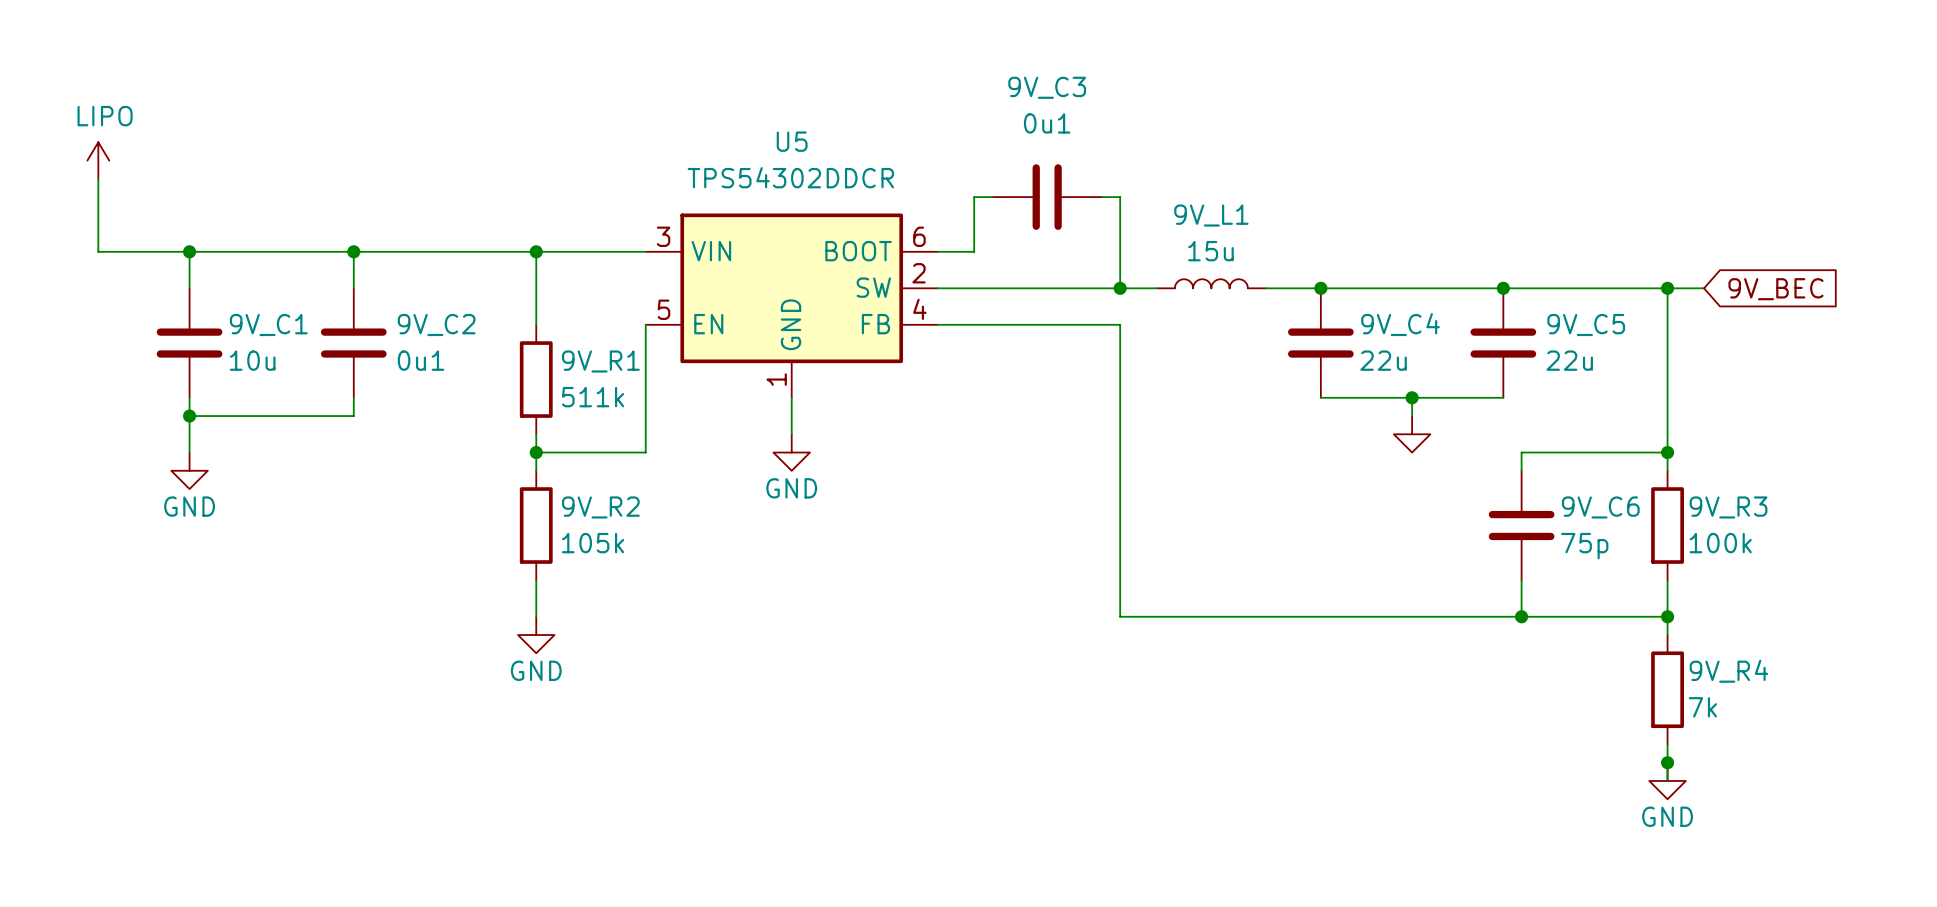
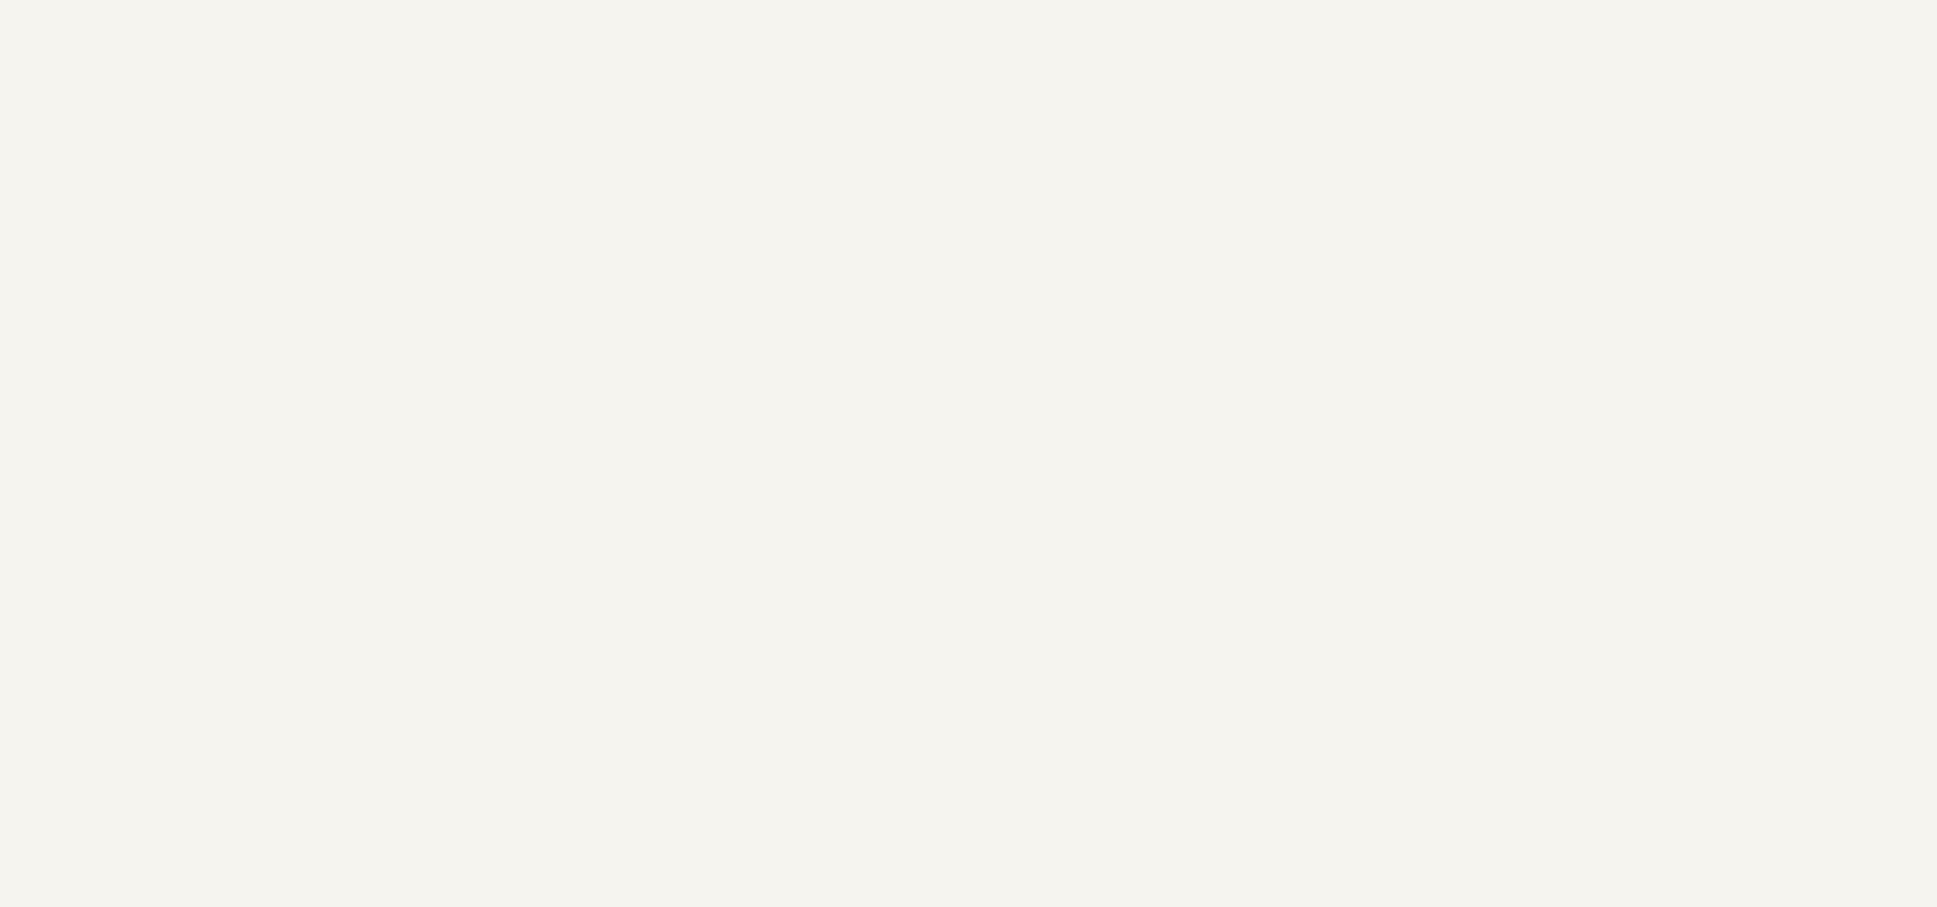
power symbol: LIPO (98, 160) -> none
wire: (98, 178) (98, 251) (645, 251) -> none
wire: (992, 197) (974, 197) (974, 251) (937, 251) -> none
9V_C3: 0u1 (1047, 197) -> none
wire: (1101, 197) (1120, 197) (1120, 288) -> none
wire: (189, 251) (189, 288) -> none
junction: (189, 251) -> none
wire: (353, 251) (353, 288) -> none
junction: (353, 251) -> none
wire: (536, 251) (536, 324) -> none
junction: (536, 251) -> none
9V_L1: 15u (1211, 283) -> none
wire: (937, 288) (1156, 288) -> none
junction: (1120, 288) -> none
wire: (1266, 288) (1704, 288) -> none
junction: (1320, 288) -> none
junction: (1503, 288) -> none
wire: (1667, 288) (1667, 470) -> none
junction: (1667, 288) -> none
global label: 9V_BEC (1775, 289) -> none
U5: TPS54302DDCR (791, 305) -> none
wire: (645, 324) (645, 452) (536, 452) -> none
wire: (937, 324) (1120, 324) (1120, 616) (1667, 616) -> none
9V_C1: 10u (189, 343) -> none
9V_C2: 0u1 (353, 343) -> none
9V_C4: 22u (1320, 343) -> none
9V_C5: 22u (1503, 343) -> none
9V_R1: 511k (536, 379) -> none
wire: (189, 397) (189, 452) -> none
wire: (353, 397) (353, 416) (189, 416) -> none
wire: (791, 397) (791, 434) -> none
wire: (1320, 397) (1503, 397) -> none
wire: (1412, 397) (1412, 416) -> none
junction: (1412, 397) -> none
junction: (189, 416) -> none
wire: (536, 434) (536, 470) -> none
power symbol: (1412, 434) -> none
junction: (536, 452) -> none
power symbol: GND (791, 452) -> none
wire: (1667, 452) (1521, 452) (1521, 470) -> none
junction: (1667, 452) -> none
power symbol: GND (189, 470) -> none
9V_R2: 105k (536, 525) -> none
9V_C6: 75p (1521, 525) -> none
9V_R3: 100k (1667, 525) -> none
wire: (536, 580) (536, 616) -> none
wire: (1521, 580) (1521, 616) -> none
wire: (1667, 580) (1667, 635) -> none
junction: (1521, 616) -> none
junction: (1667, 616) -> none
power symbol: GND (536, 635) -> none
9V_R4: 7k (1667, 689) -> none
wire: (1667, 744) (1667, 780) -> none
junction: (1667, 762) -> none
power symbol: GND (1667, 780) -> none

